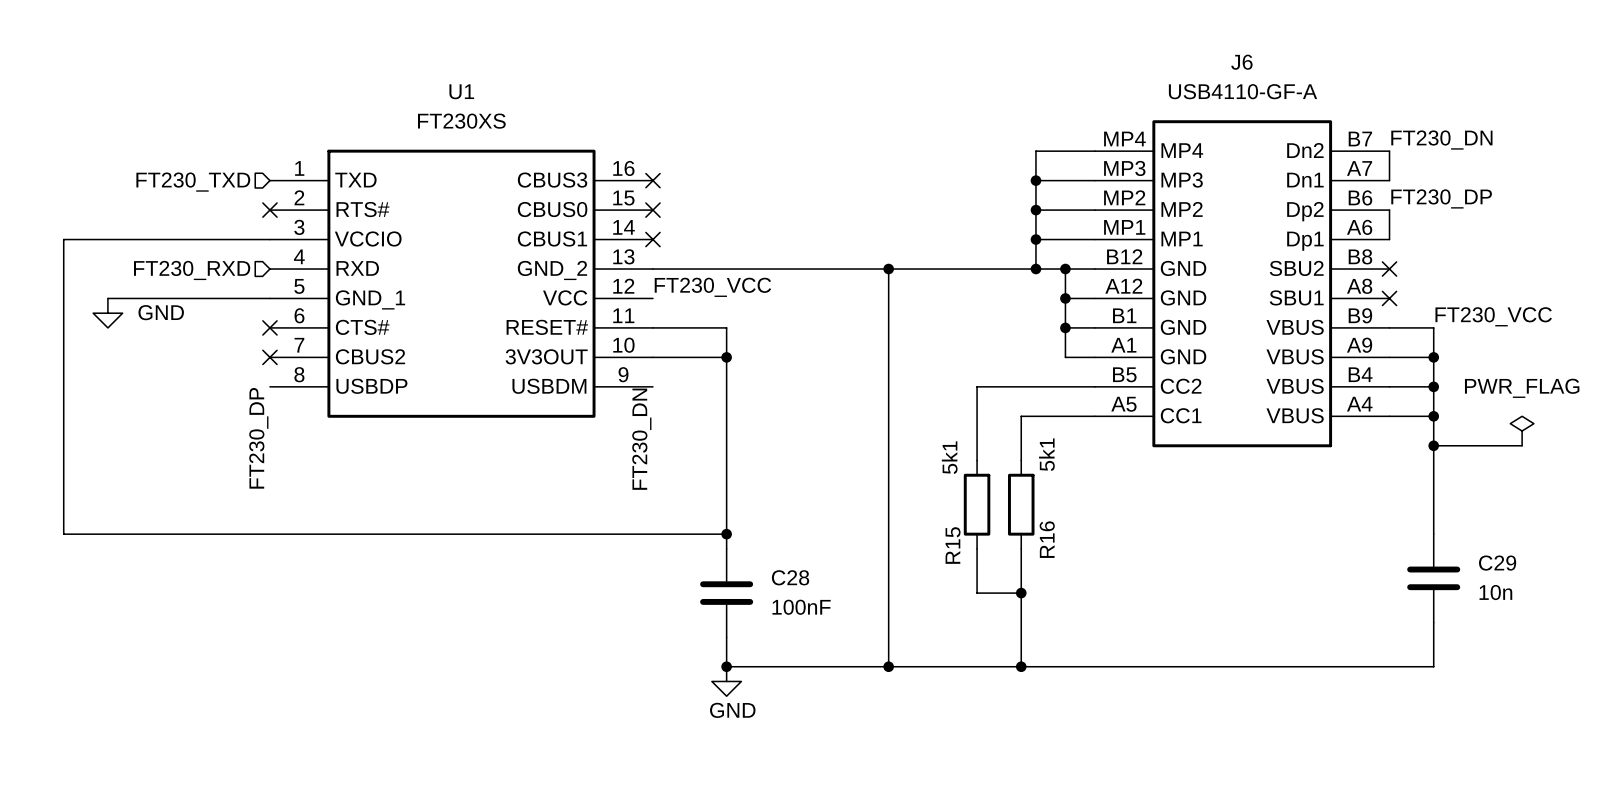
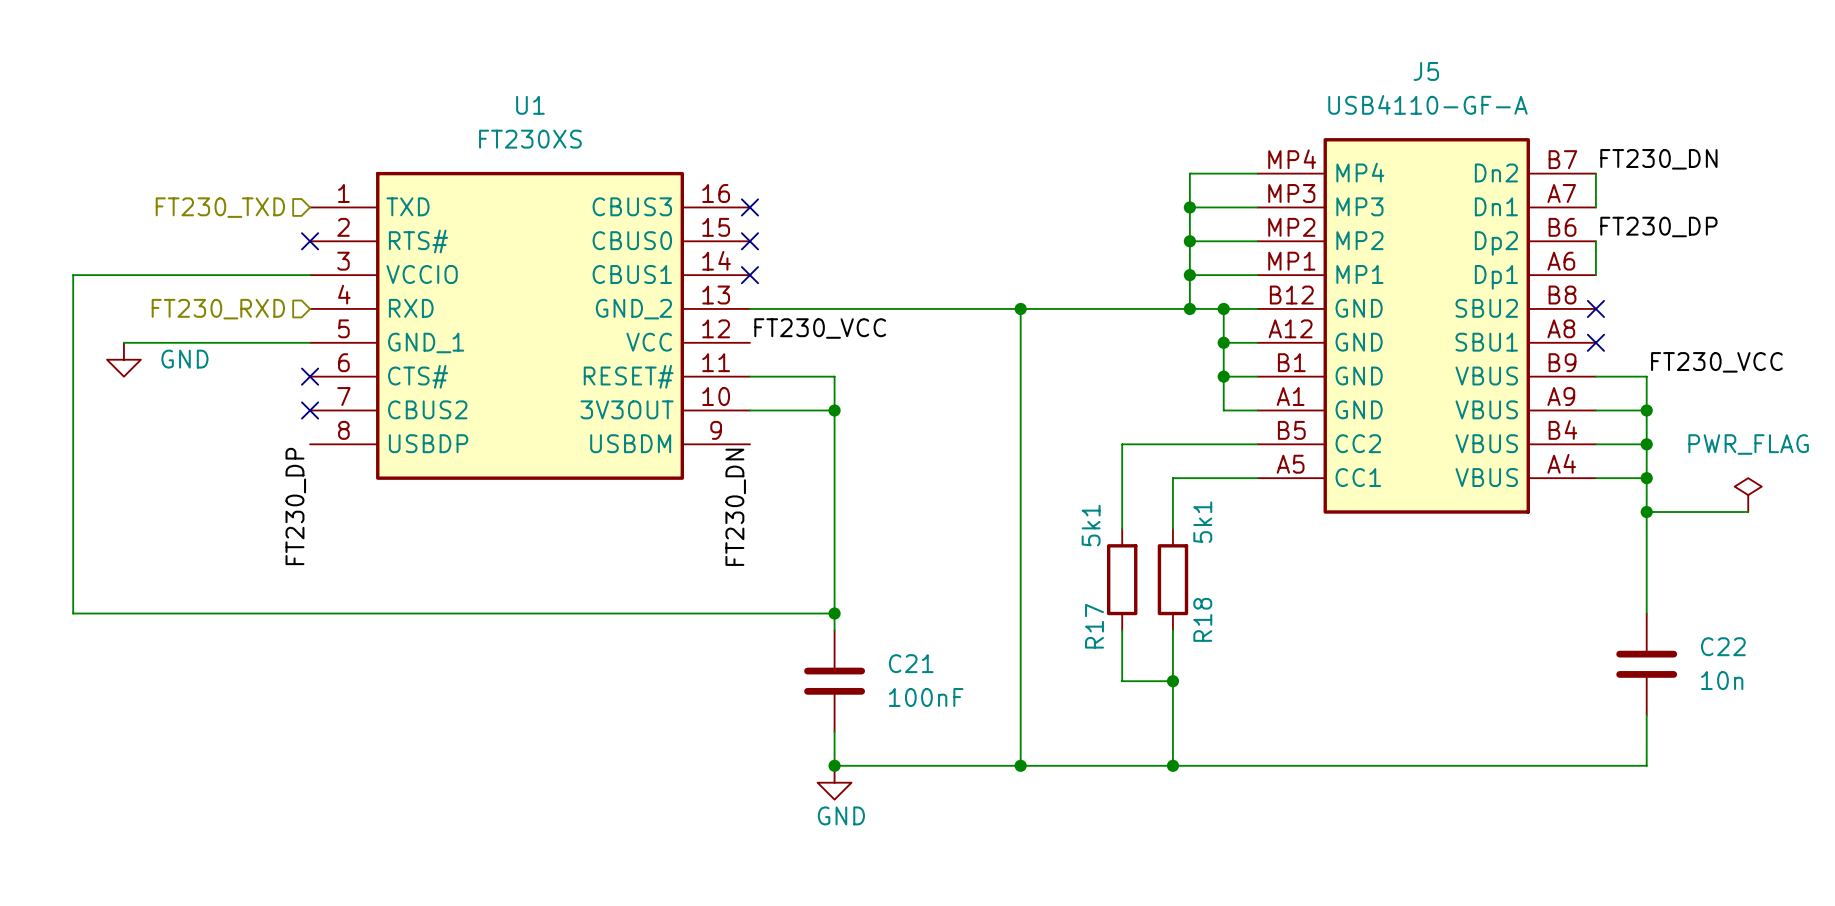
J6 name: J6 (1241, 62) -> J5 (1426, 71)
R16 name: R16 (1047, 539) -> R18 (1202, 619)
R15 name: R15 (953, 545) -> R17 (1094, 626)
C29 name: C29 (1497, 563) -> C22 (1723, 646)
C28 name: C28 (790, 577) -> C21 (911, 663)

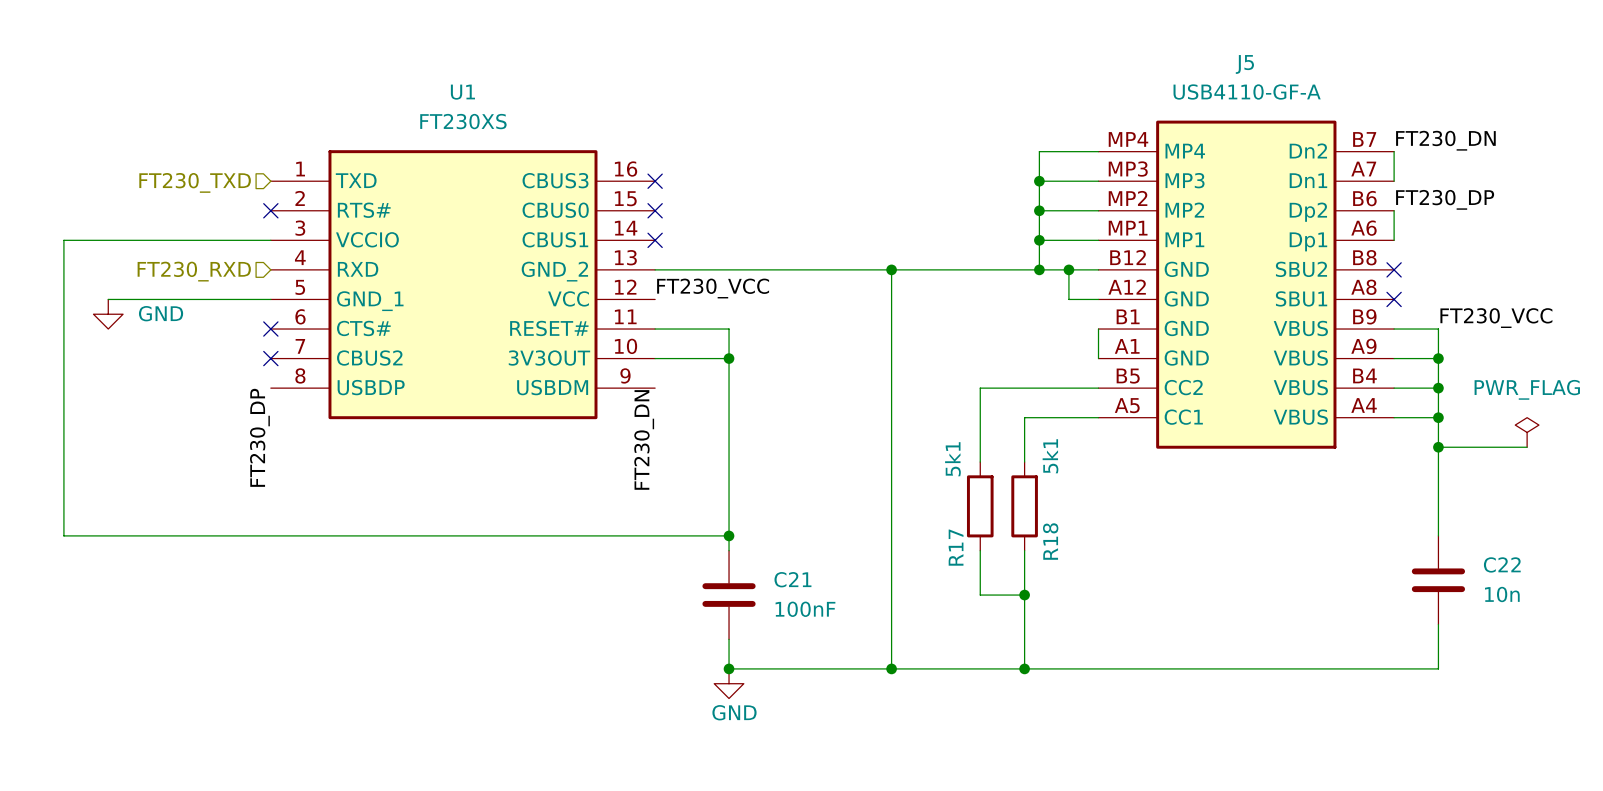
wire: (1223, 342) (1223, 410) (1257, 410) -> (1098, 329) (1098, 358)
junction: (1223, 342) -> none
wire: (1223, 376) (1257, 376) -> none
junction: (1223, 376) -> none

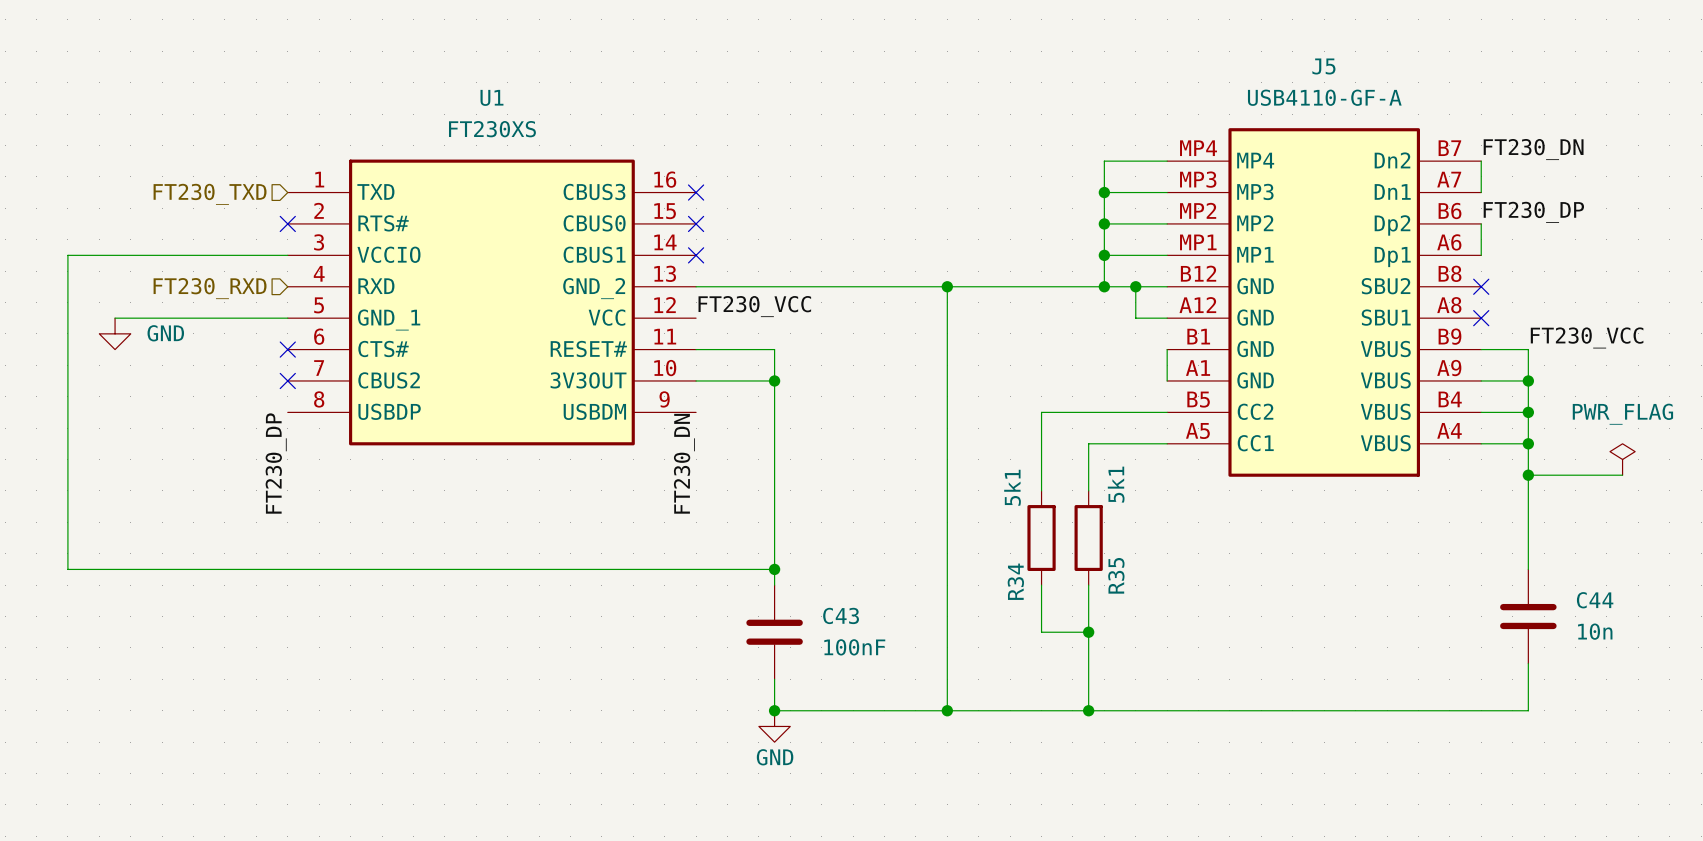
R18 name: R18 (1050, 541) -> R35 (1116, 575)
R17 name: R17 (956, 547) -> R34 (1015, 581)
C22 name: C22 (1502, 564) -> C44 (1595, 600)
C21 name: C21 (792, 579) -> C43 (841, 615)

